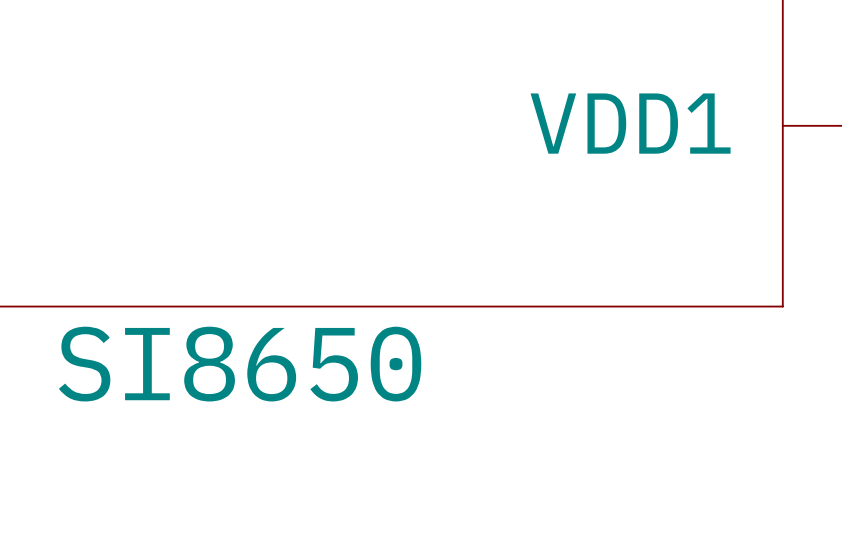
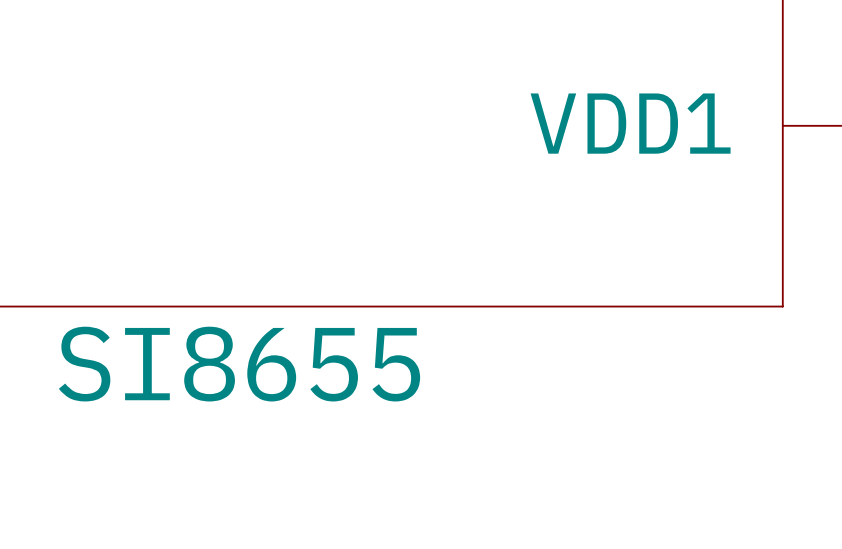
part value: SI8650 (240, 364) -> SI8655 (239, 364)

